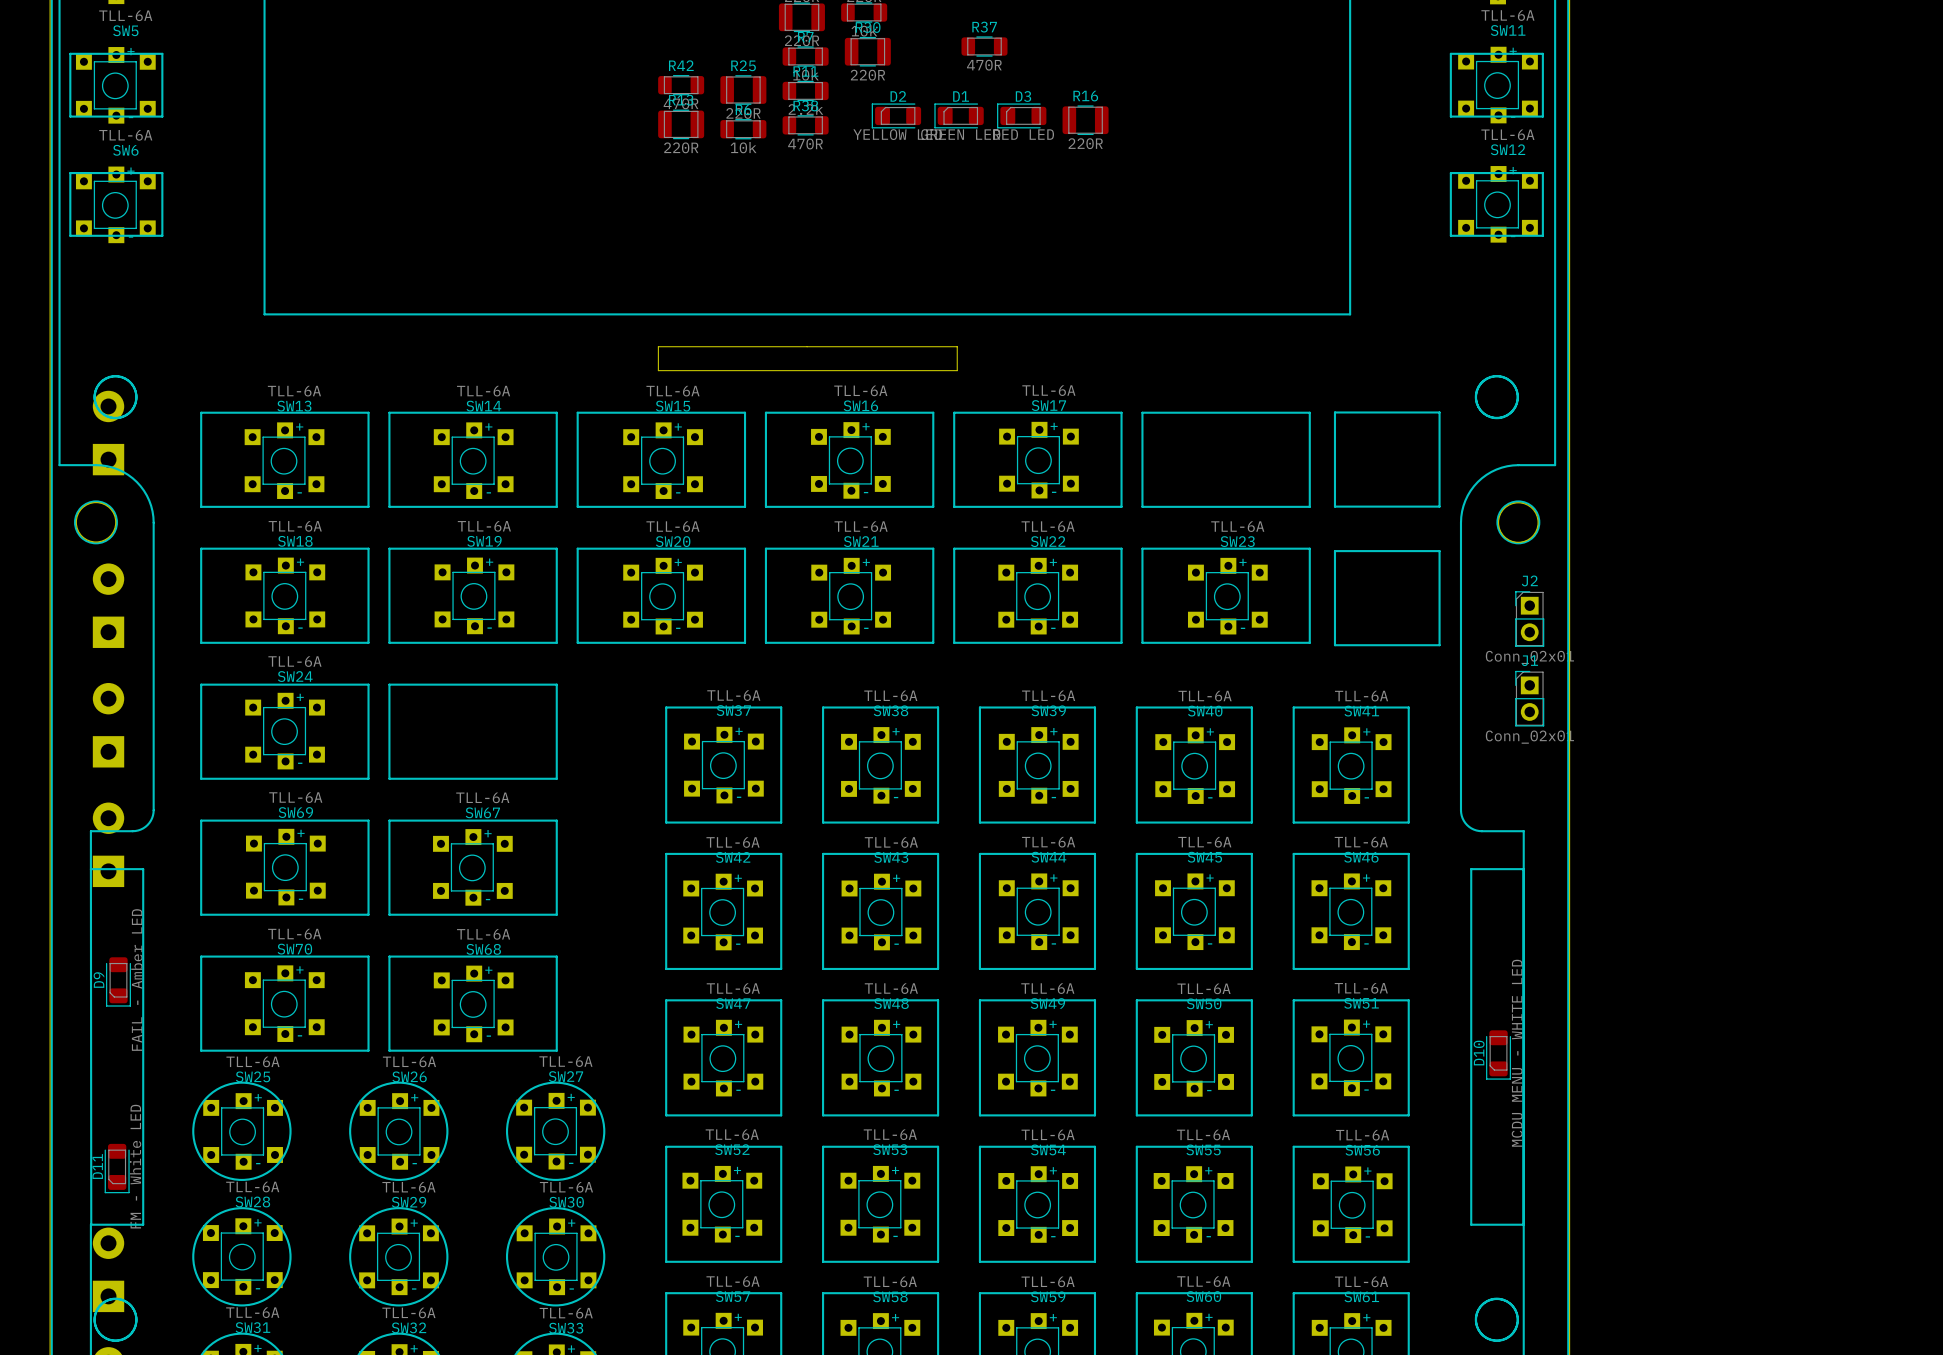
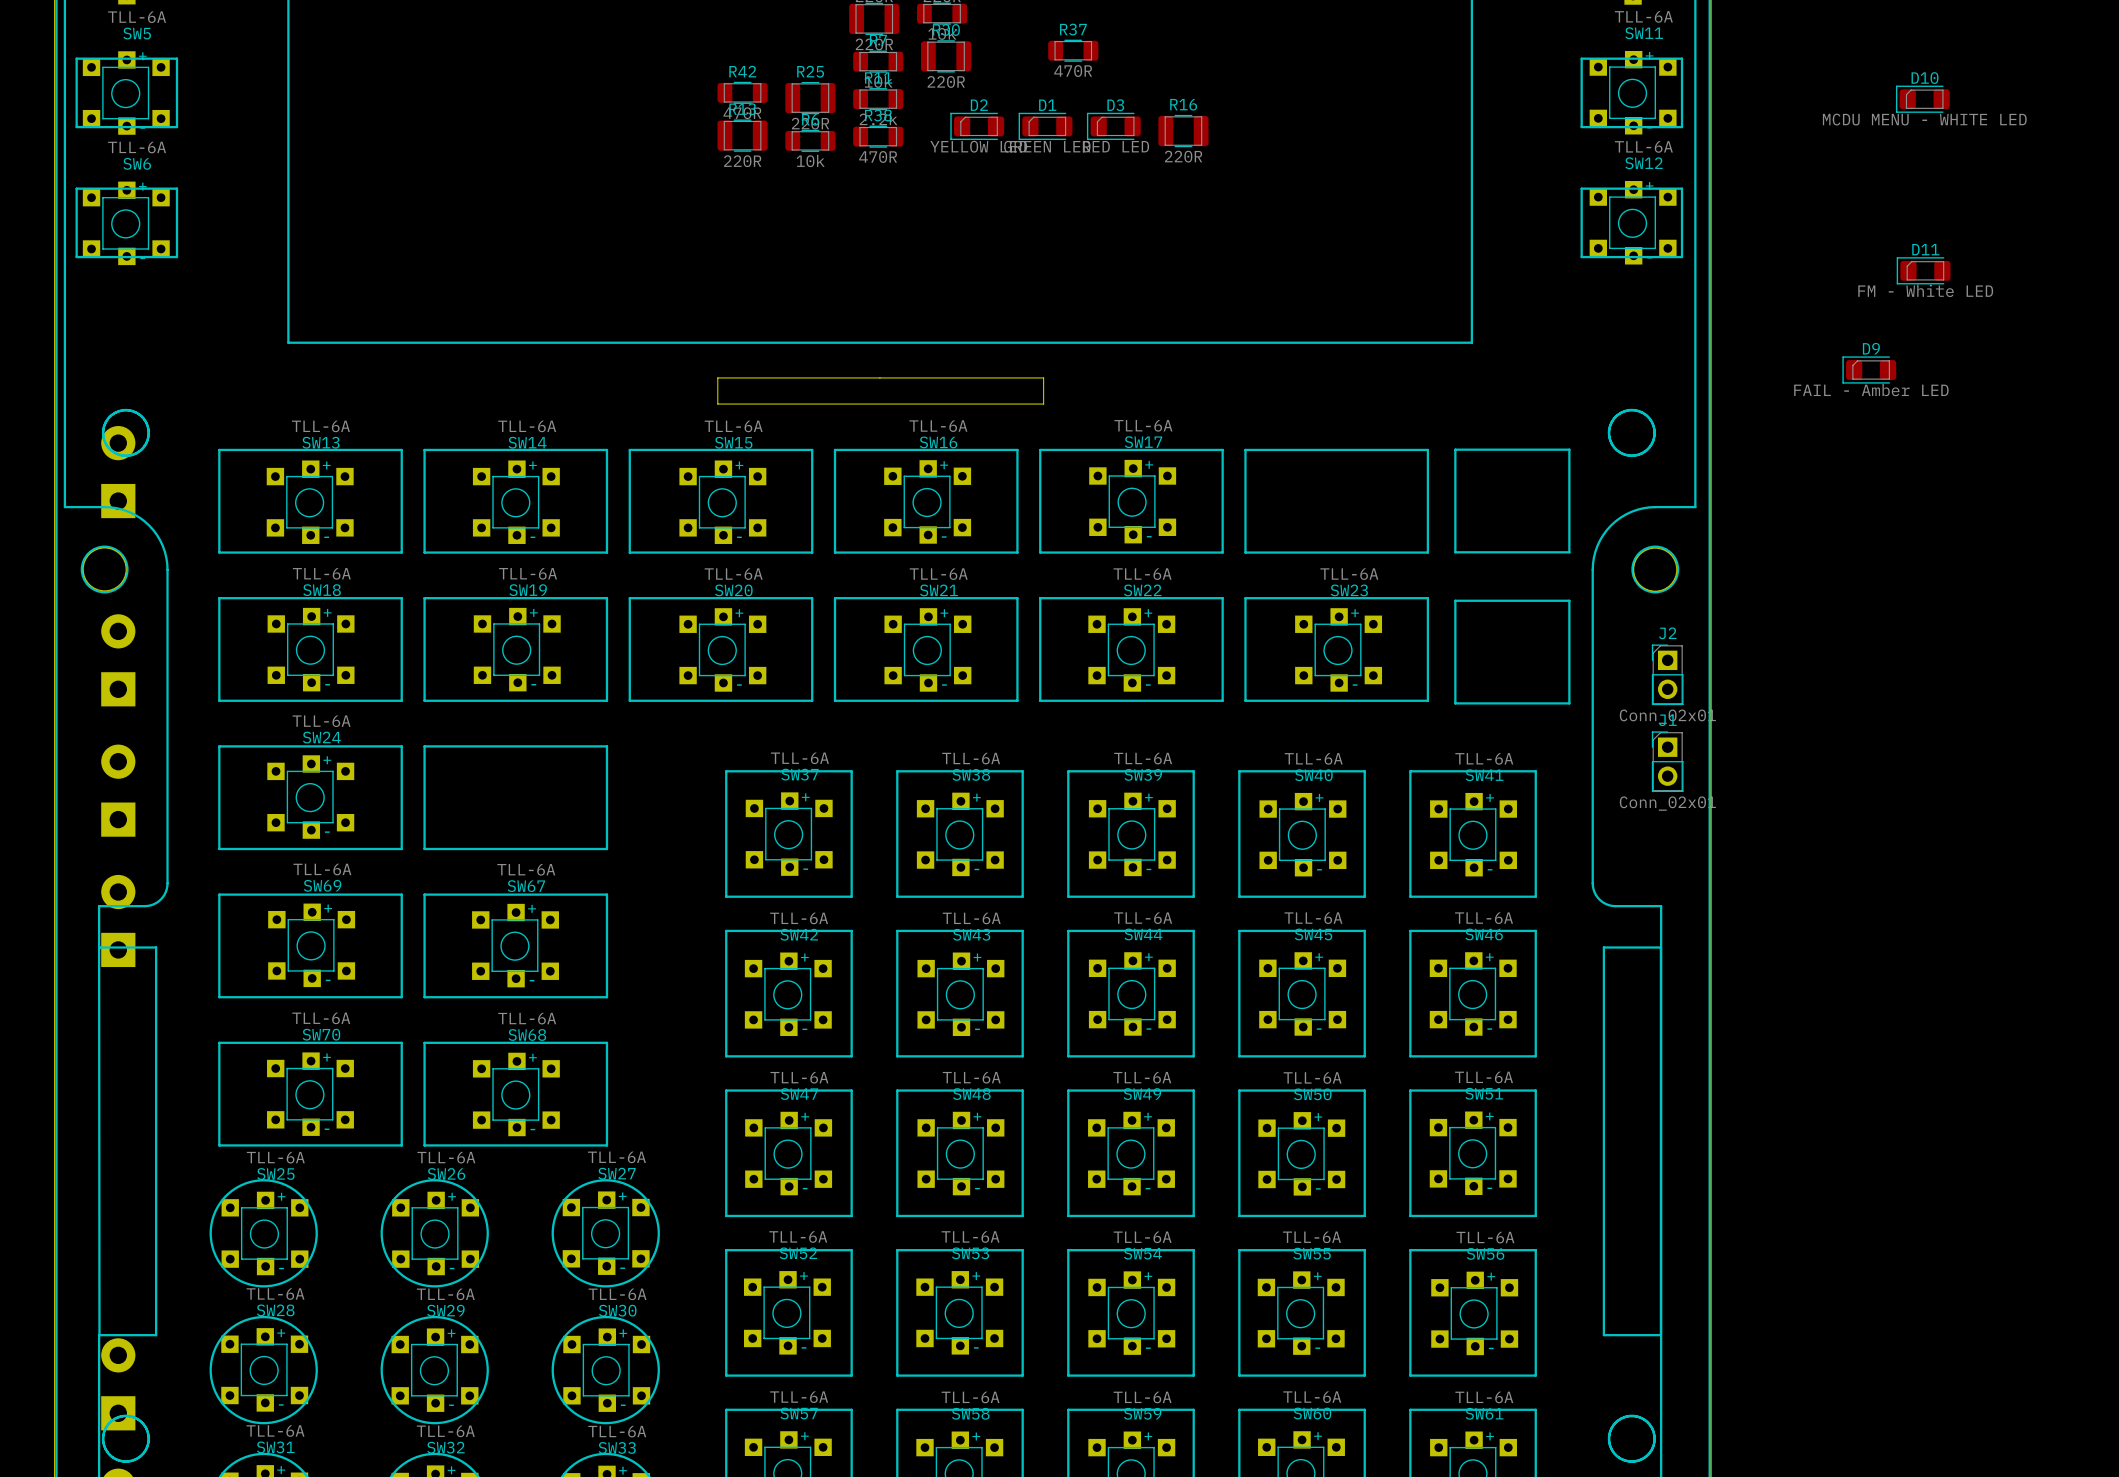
D9 rotation: 0° (118, 981) -> 90° clockwise (1869, 370)
D9 position: (118, 981) -> (1869, 370)
D10 rotation: 0° (1498, 1055) -> 90° clockwise (1922, 99)
D10 position: (1498, 1055) -> (1922, 99)
D11 rotation: 0° (117, 1168) -> 90° clockwise (1923, 270)
D11 position: (117, 1168) -> (1923, 270)

